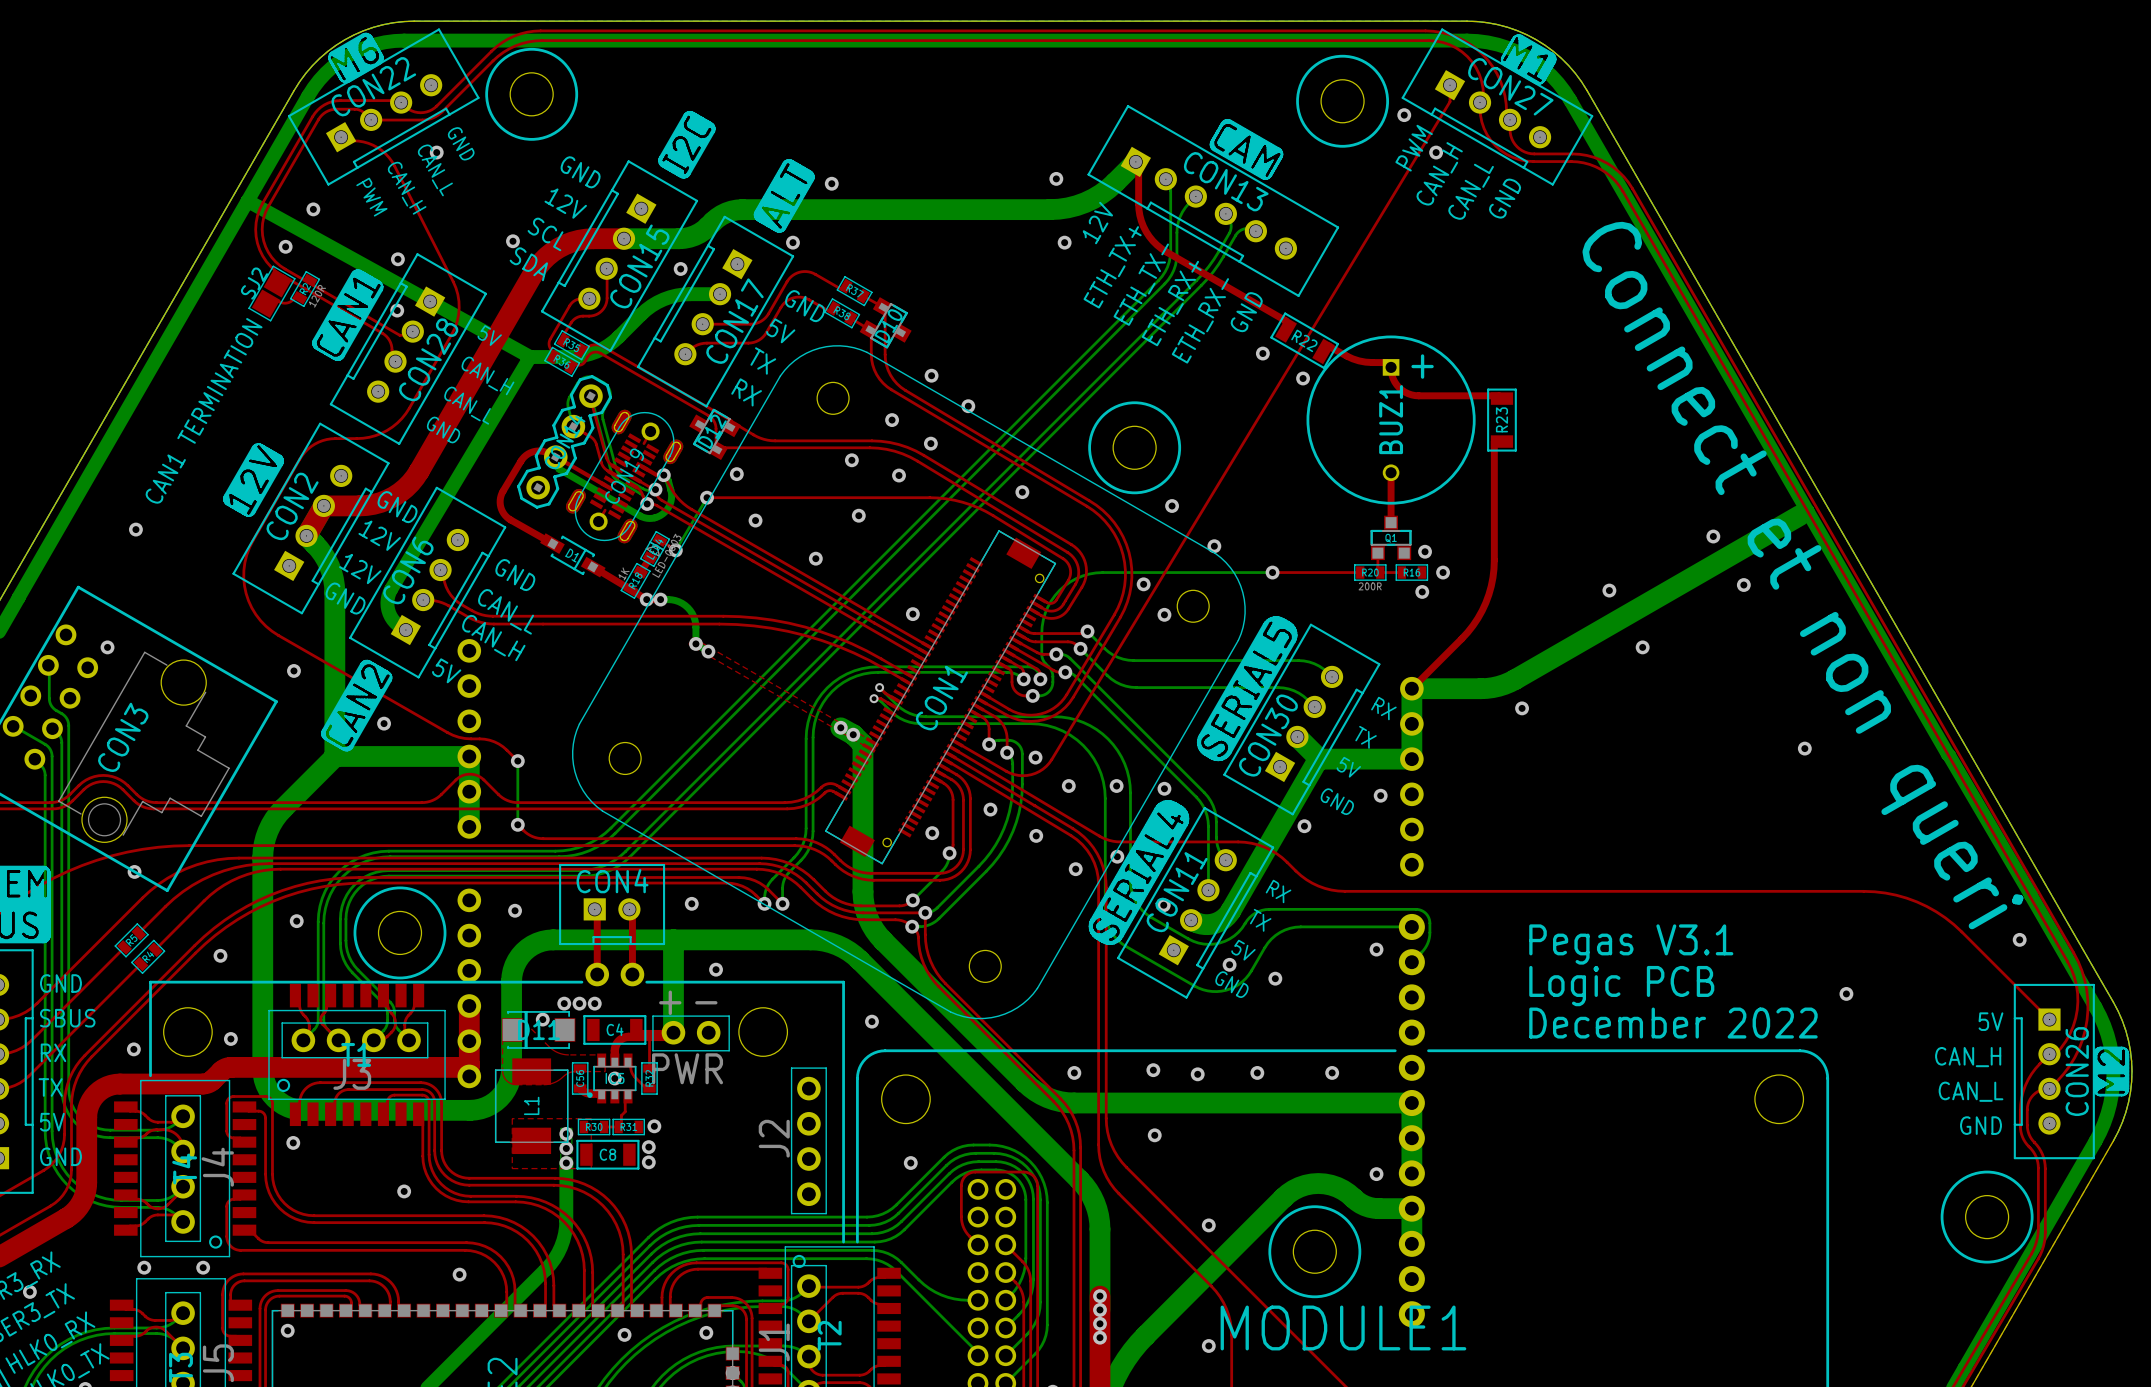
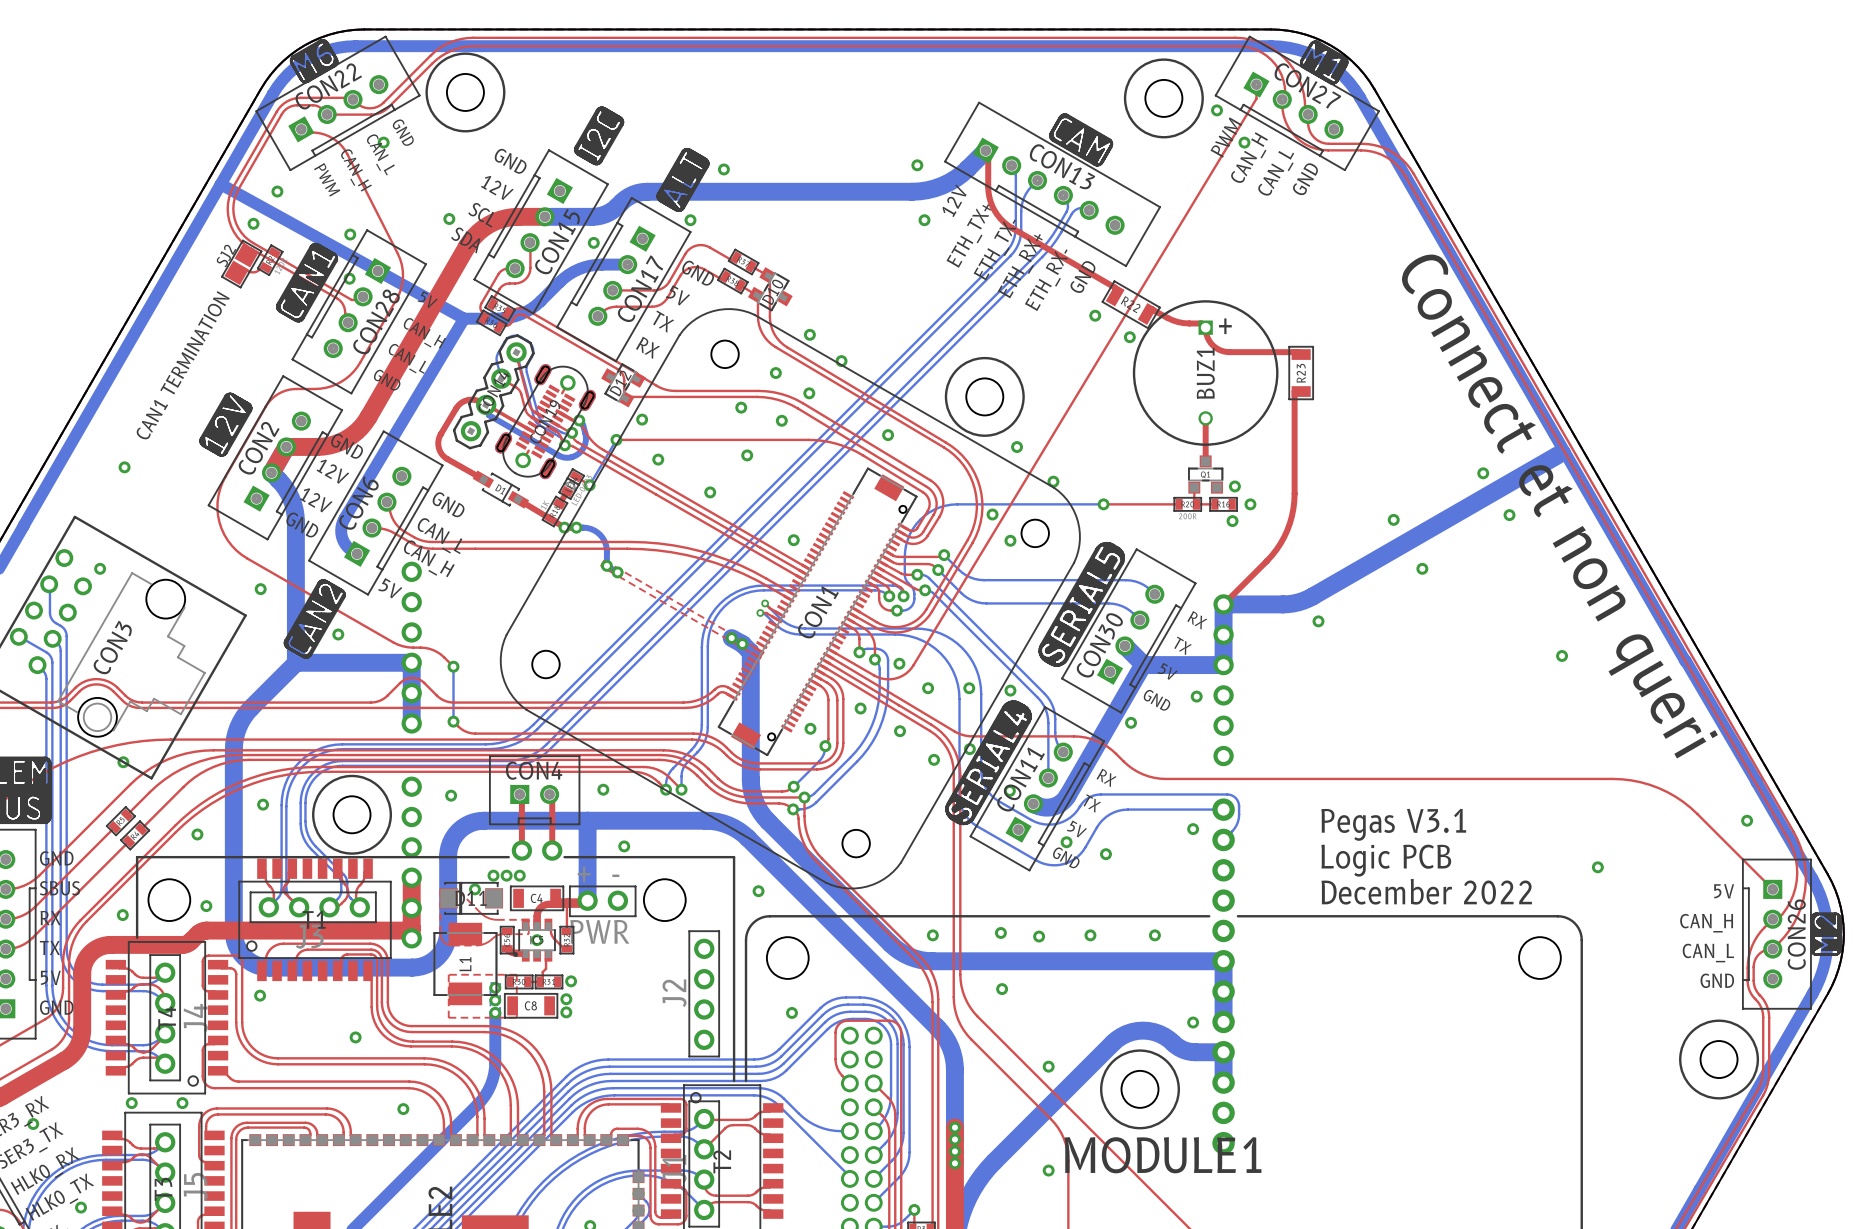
via: (287, 1330) -> none
via: (706, 1332) -> none
via: (624, 1334) -> none

